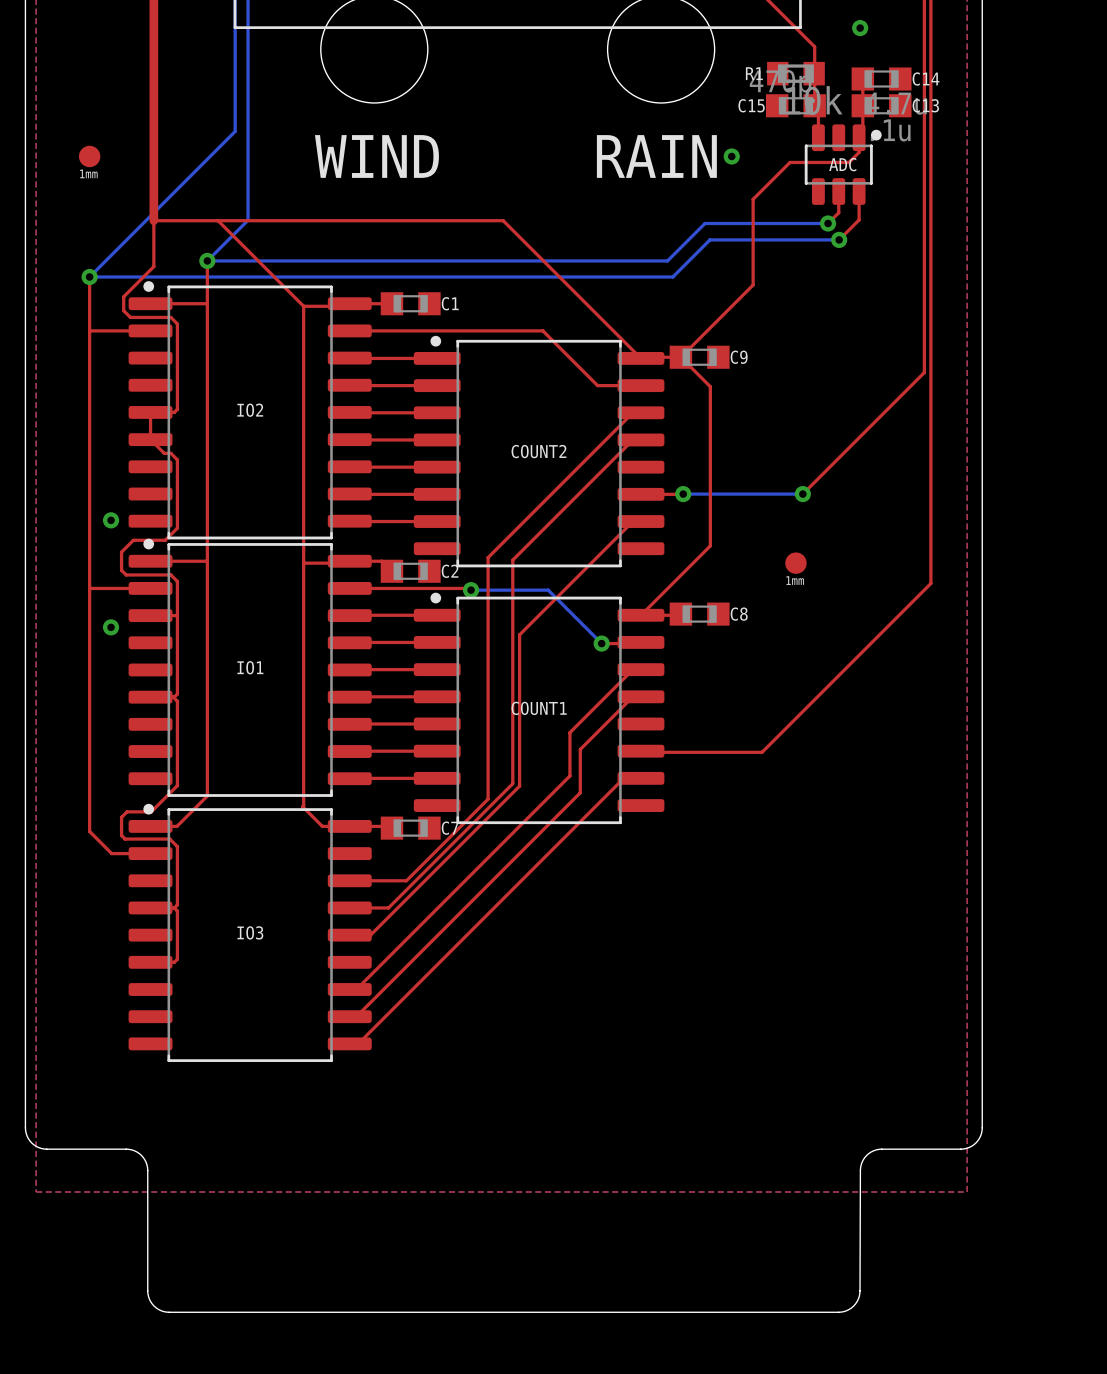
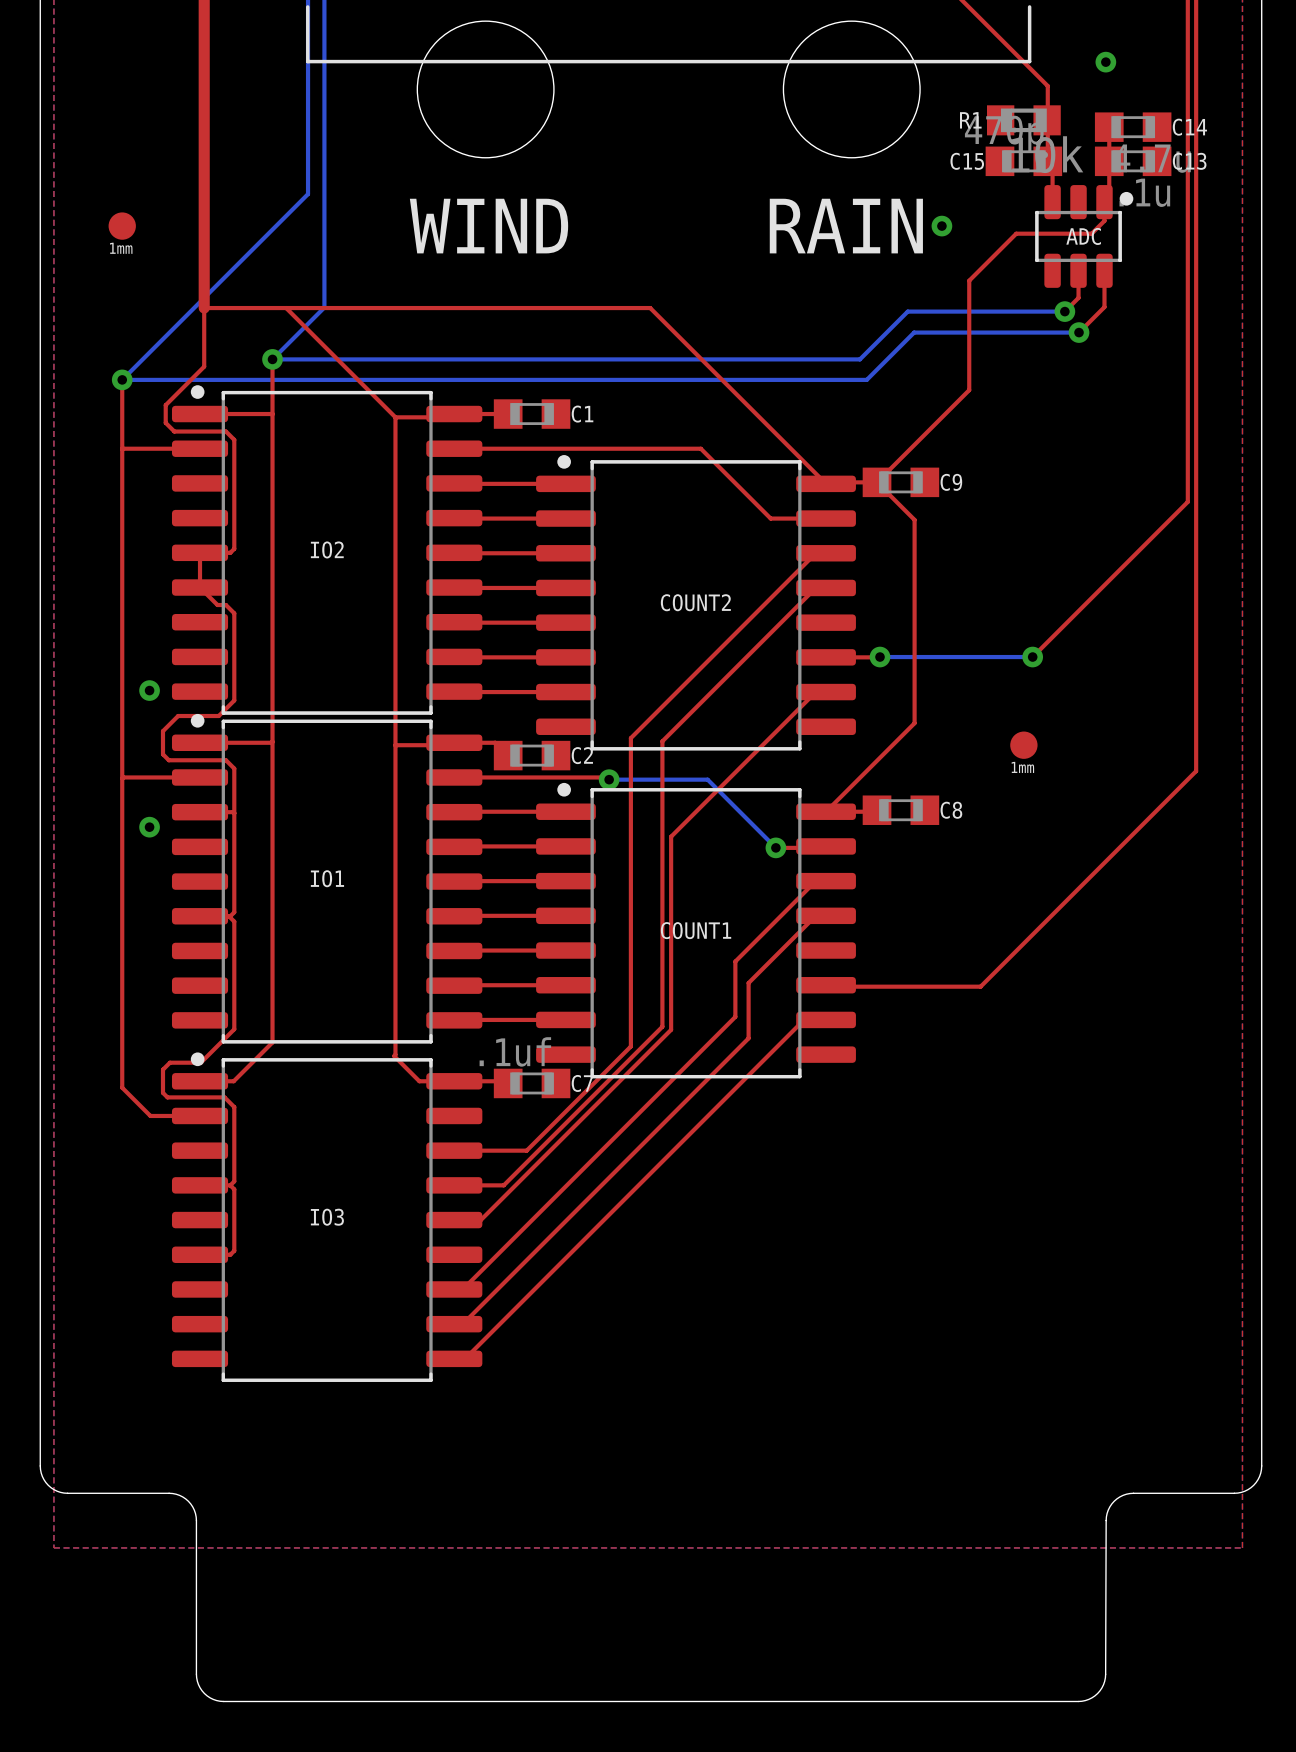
C7 value: none -> .1uf (515, 1051)

